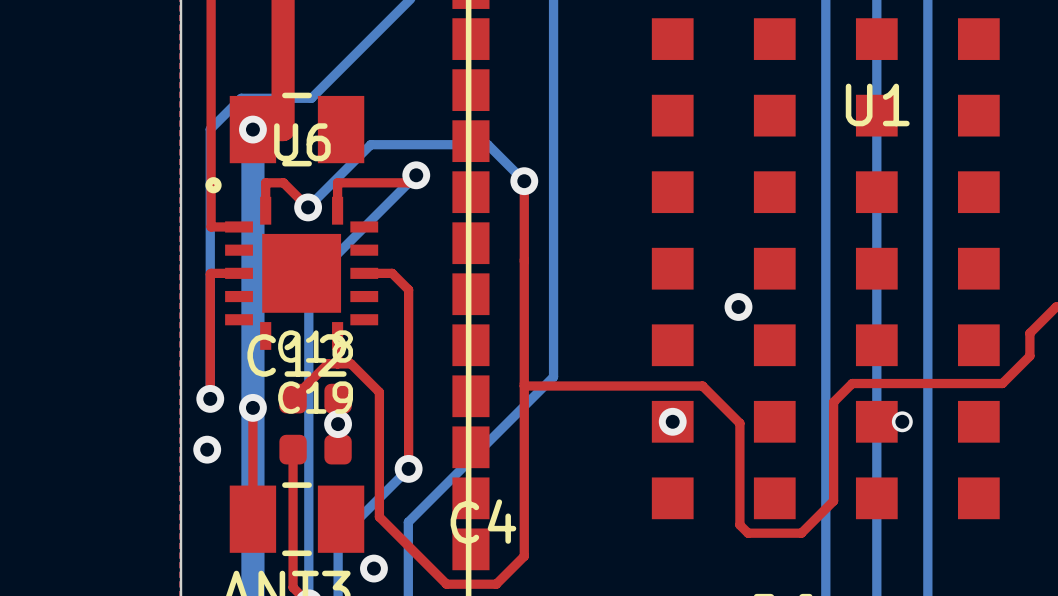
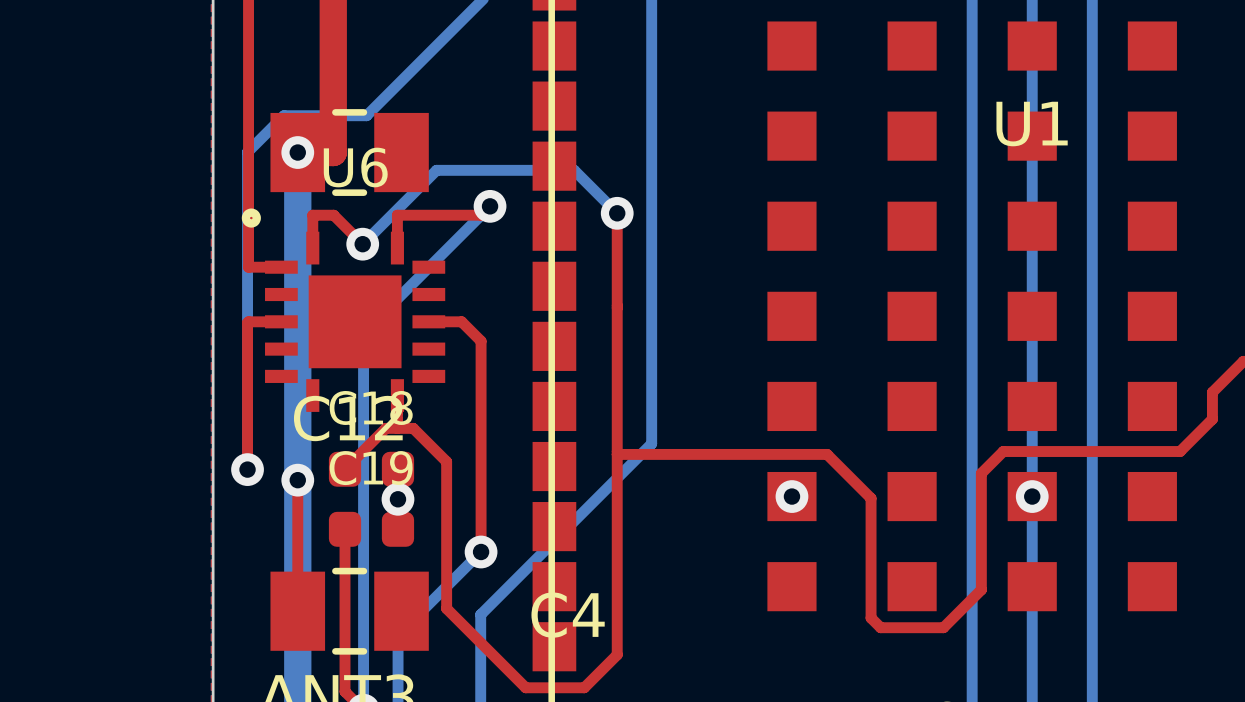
via position: (738, 306) -> (1032, 496)
via: (902, 421) -> none
via: (207, 449) -> none
via: (373, 568) -> none

